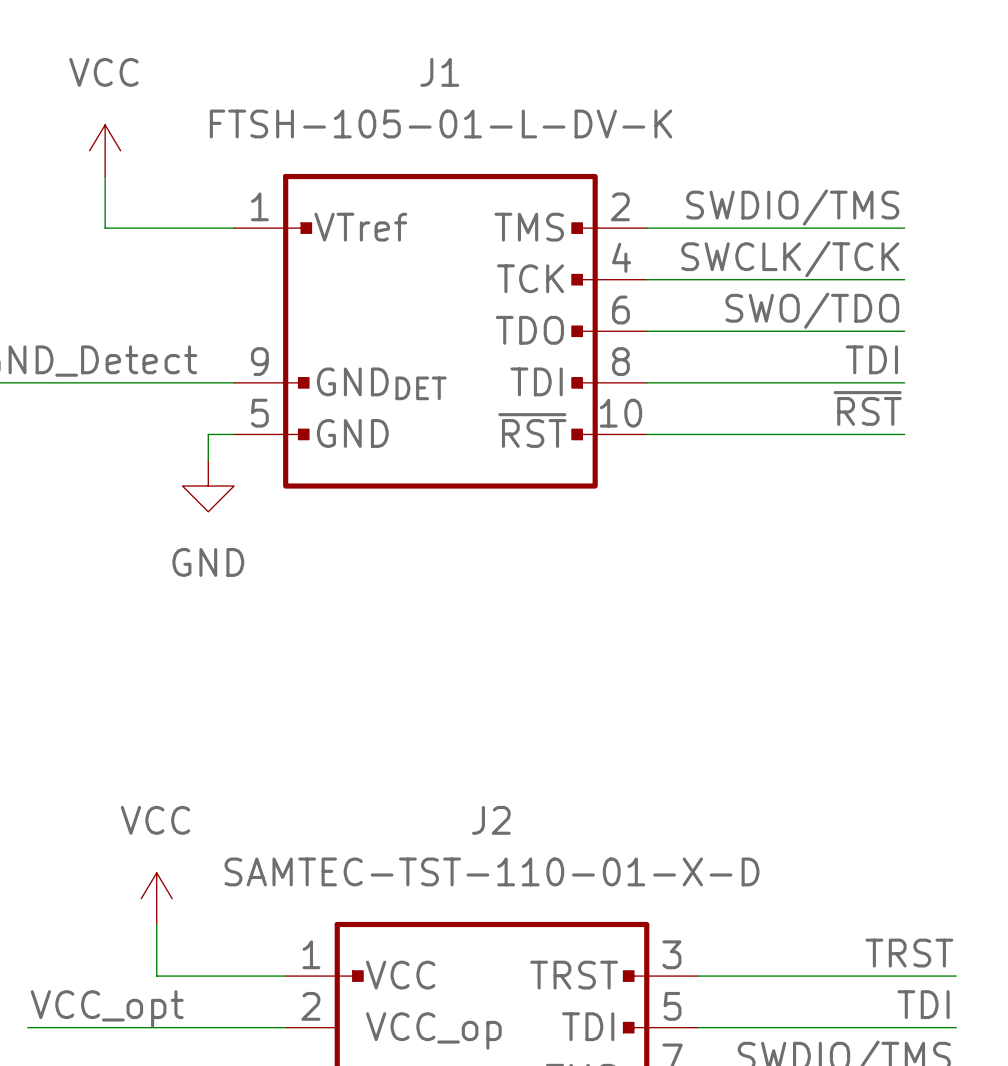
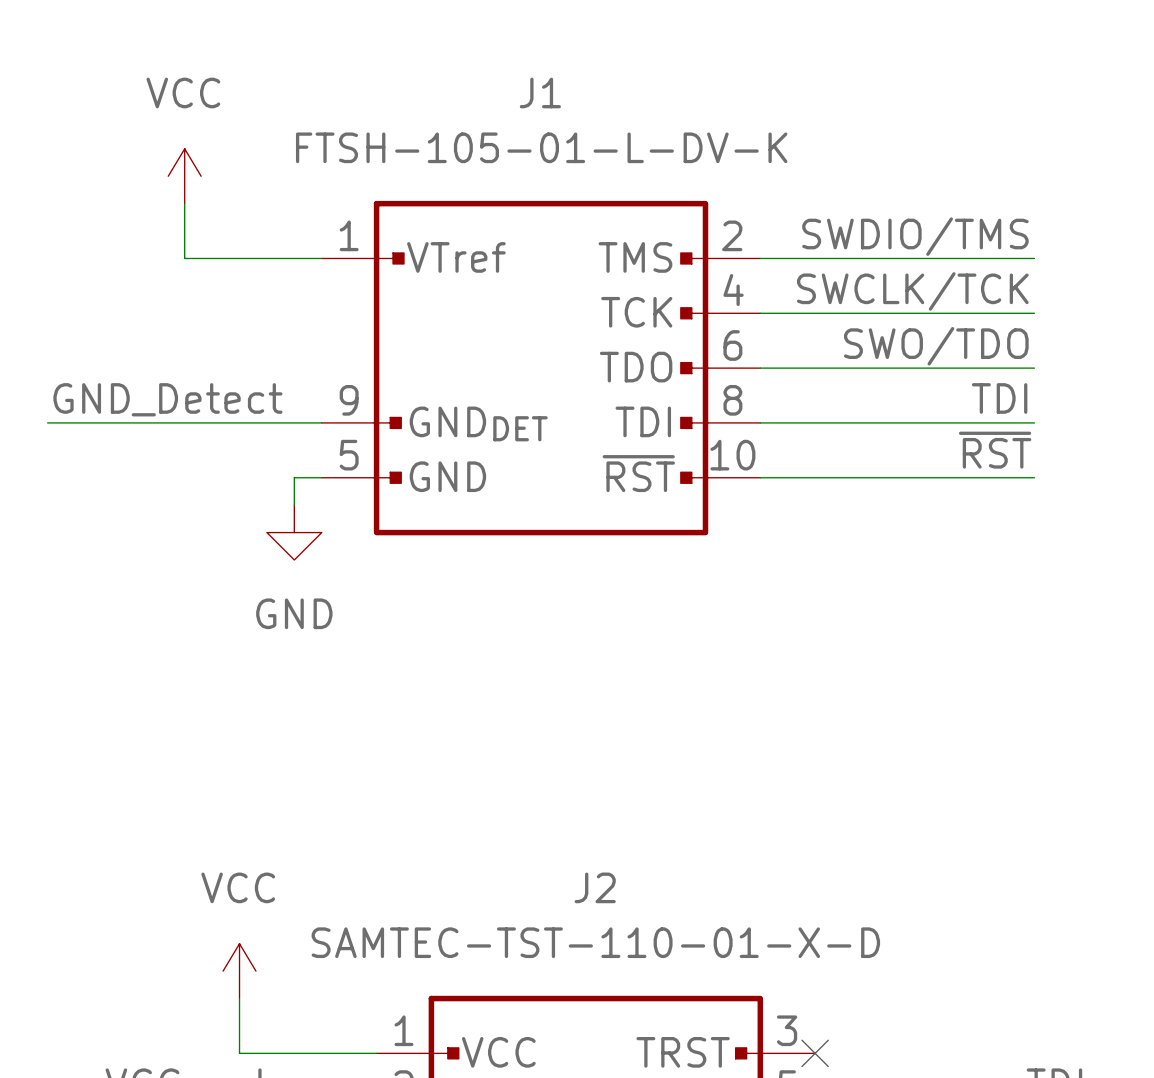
label: TRST (909, 953) -> none
wire: (698, 976) (956, 976) -> none
no-connect mark: none -> (815, 1053)

